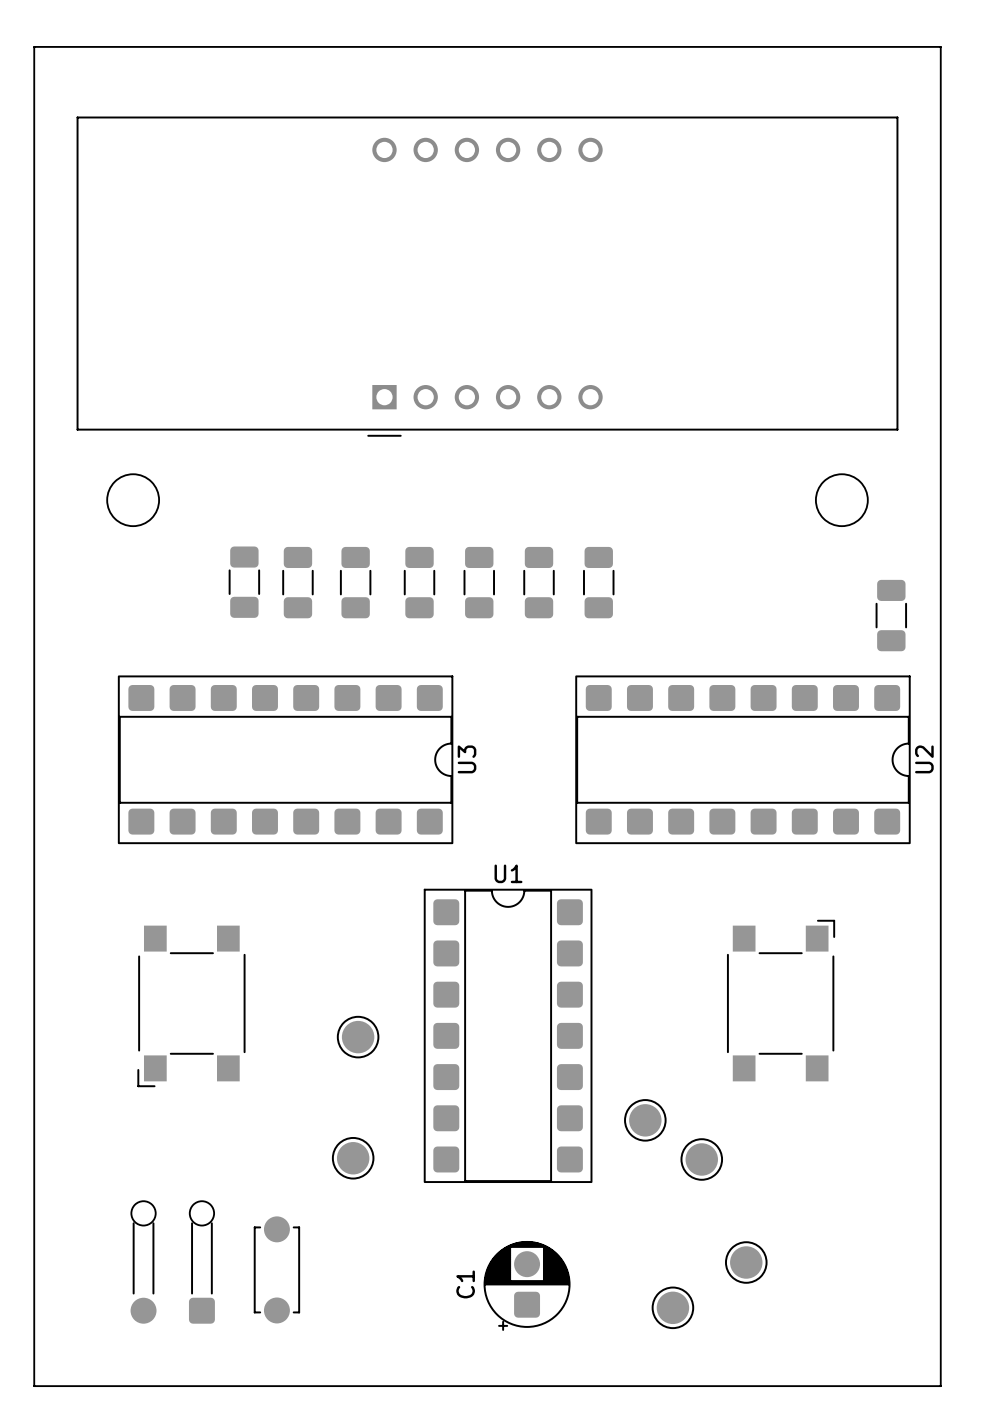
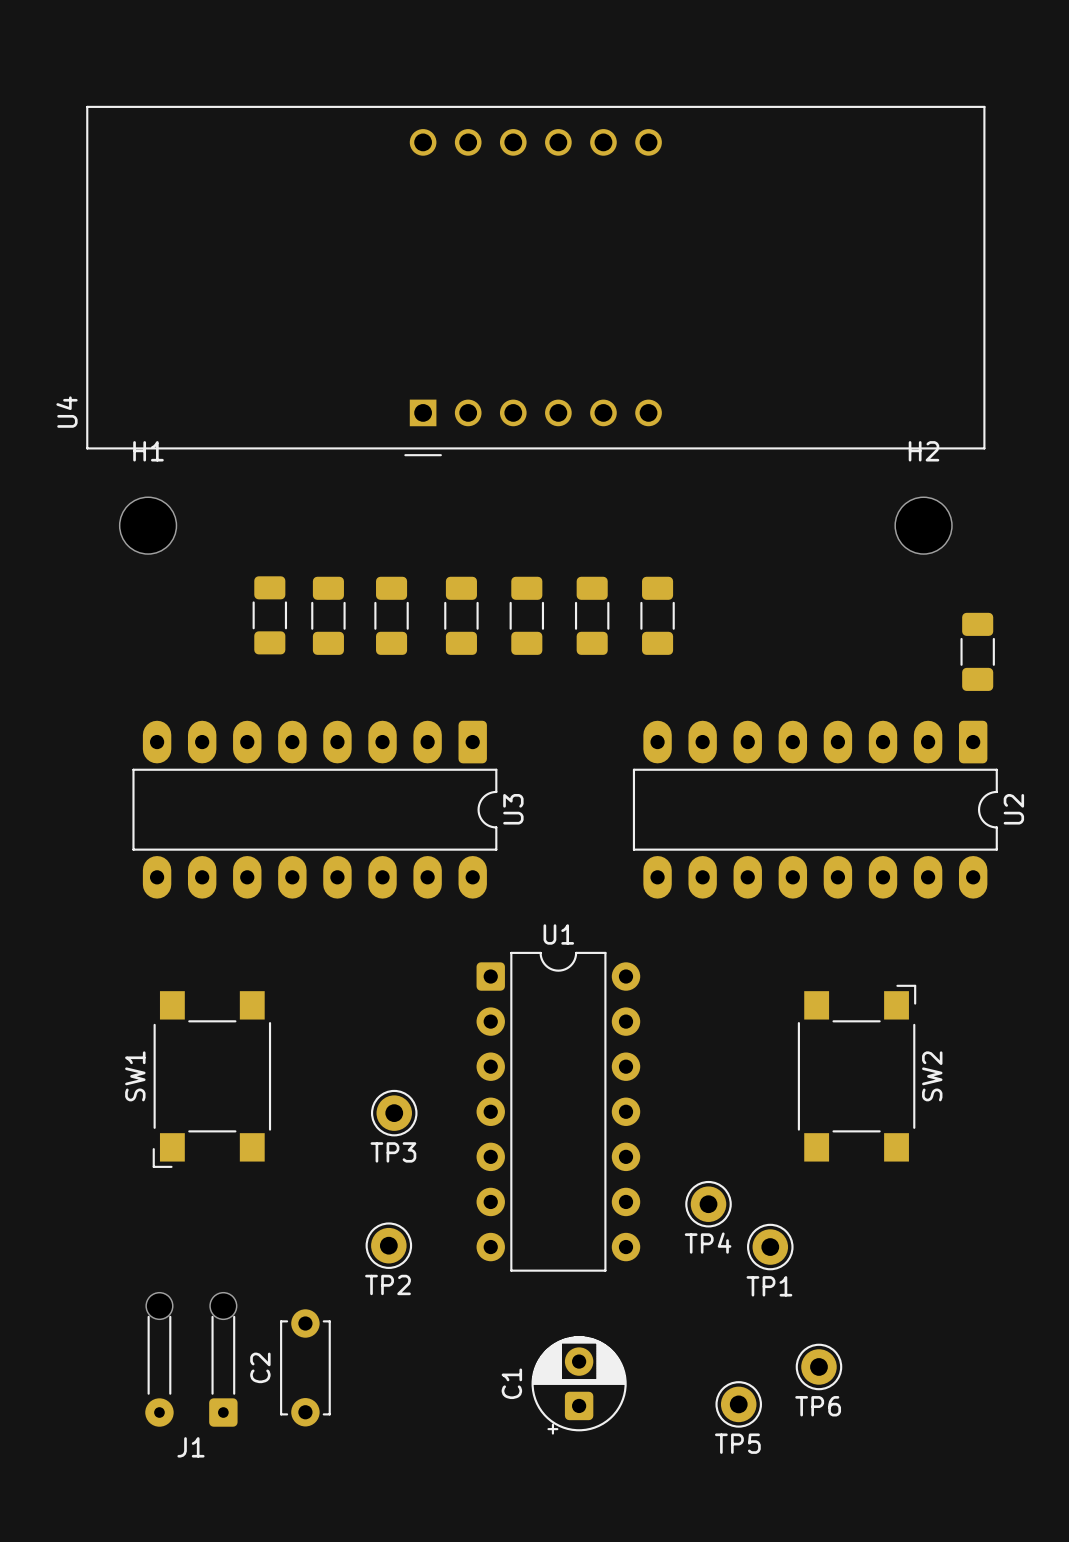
board edge: (34, 46) (940, 46) (940, 1386) (34, 1386) (34, 46) -> none
U4 name: none -> U4 (67, 412)
H1 name: none -> H1 (148, 451)
H2 name: none -> H2 (924, 451)
U3 footprint: [117, 675, 454, 845] -> [132, 720, 498, 899]
U2 footprint: [575, 675, 911, 845] -> [632, 720, 998, 899]
U1 footprint: [423, 888, 593, 1184] -> [476, 951, 641, 1272]
SW1 name: none -> SW1 (135, 1076)
SW2 name: none -> SW2 (932, 1076)
part: (358, 1037) -> none
TP3: none -> (394, 1113)
part: (645, 1120) -> none
TP4: none -> (708, 1204)
part: (353, 1158) -> none
TP2: none -> (388, 1245)
part: (701, 1159) -> none
TP1: none -> (770, 1247)
C1 footprint: [483, 1240, 571, 1331] -> [531, 1336, 627, 1435]
part: (172, 1262) -> none
J1: none -> (191, 1359)
part: (746, 1262) -> none
part: (276, 1269) -> none
C2: none -> (305, 1367)
TP6: none -> (818, 1366)
TP5: none -> (738, 1404)
part: (672, 1307) -> none

